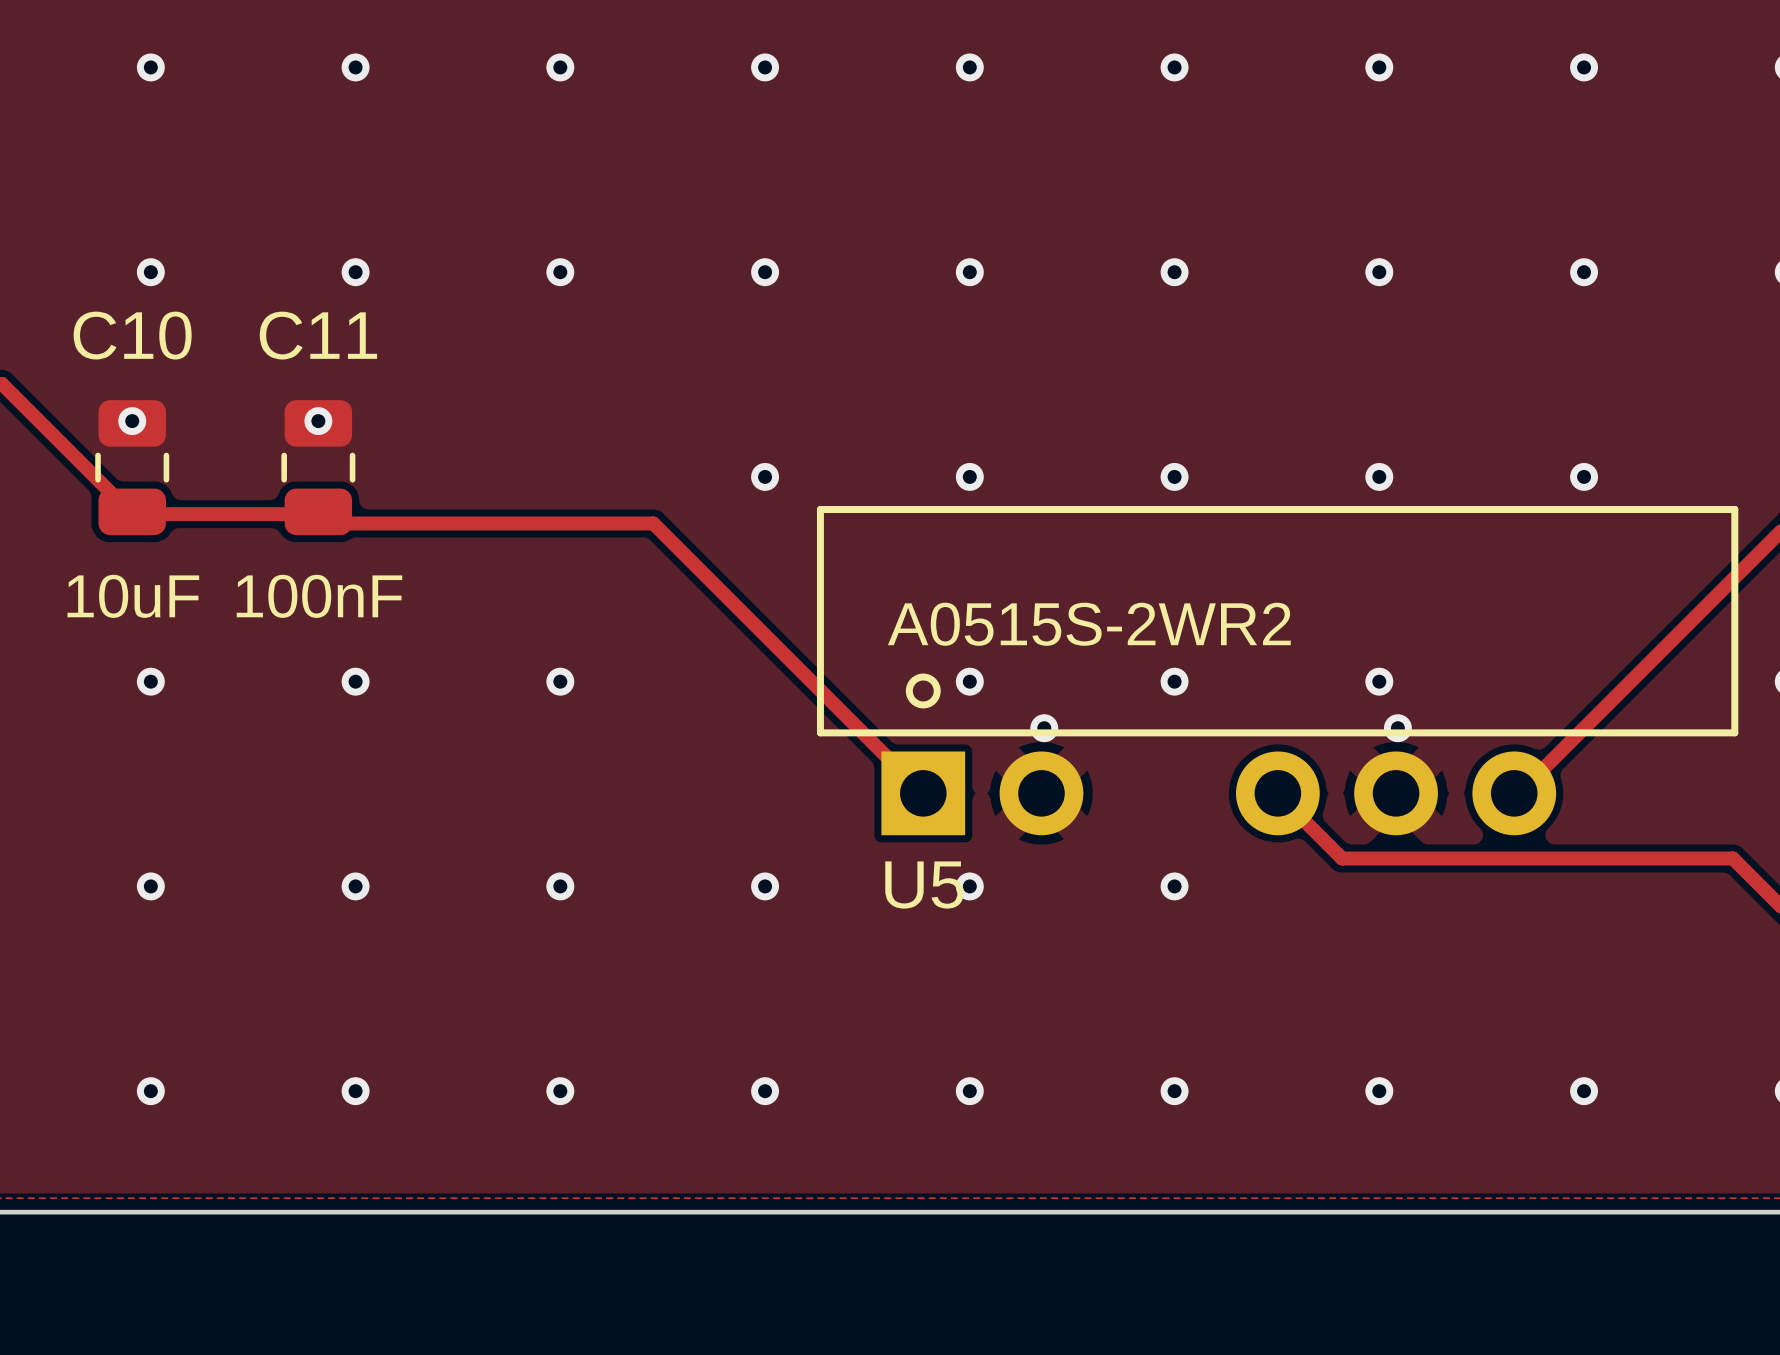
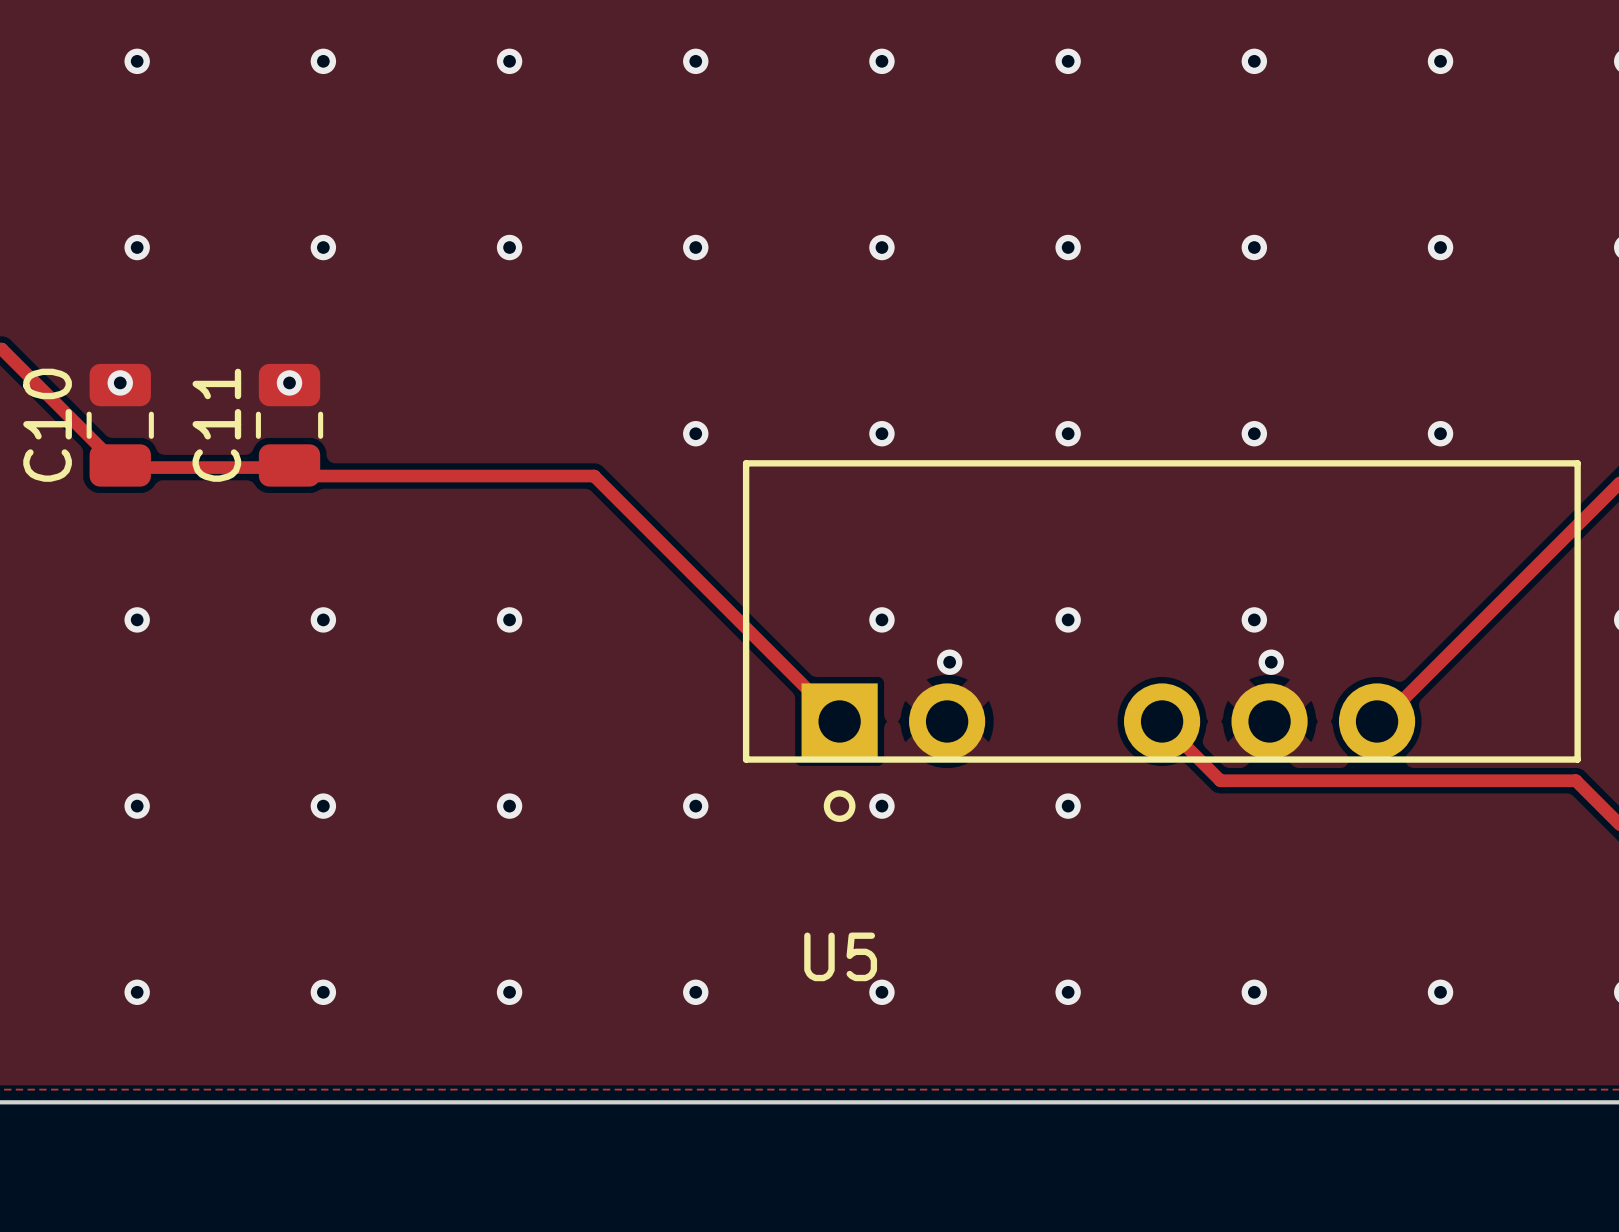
C10 name rotation: 0° (132, 335) -> 90° counterclockwise (47, 425)
C11 name rotation: 0° (318, 335) -> 90° counterclockwise (216, 425)
U5 footprint: [816, 506, 1739, 836] -> [742, 460, 1581, 822]
C10 value: 10uF (133, 596) -> none
C11 value: 100nF (319, 596) -> none
U5 value: A0515S-2WR2 (1089, 624) -> none
U5 name position: U5 (924, 885) -> U5 (840, 956)

